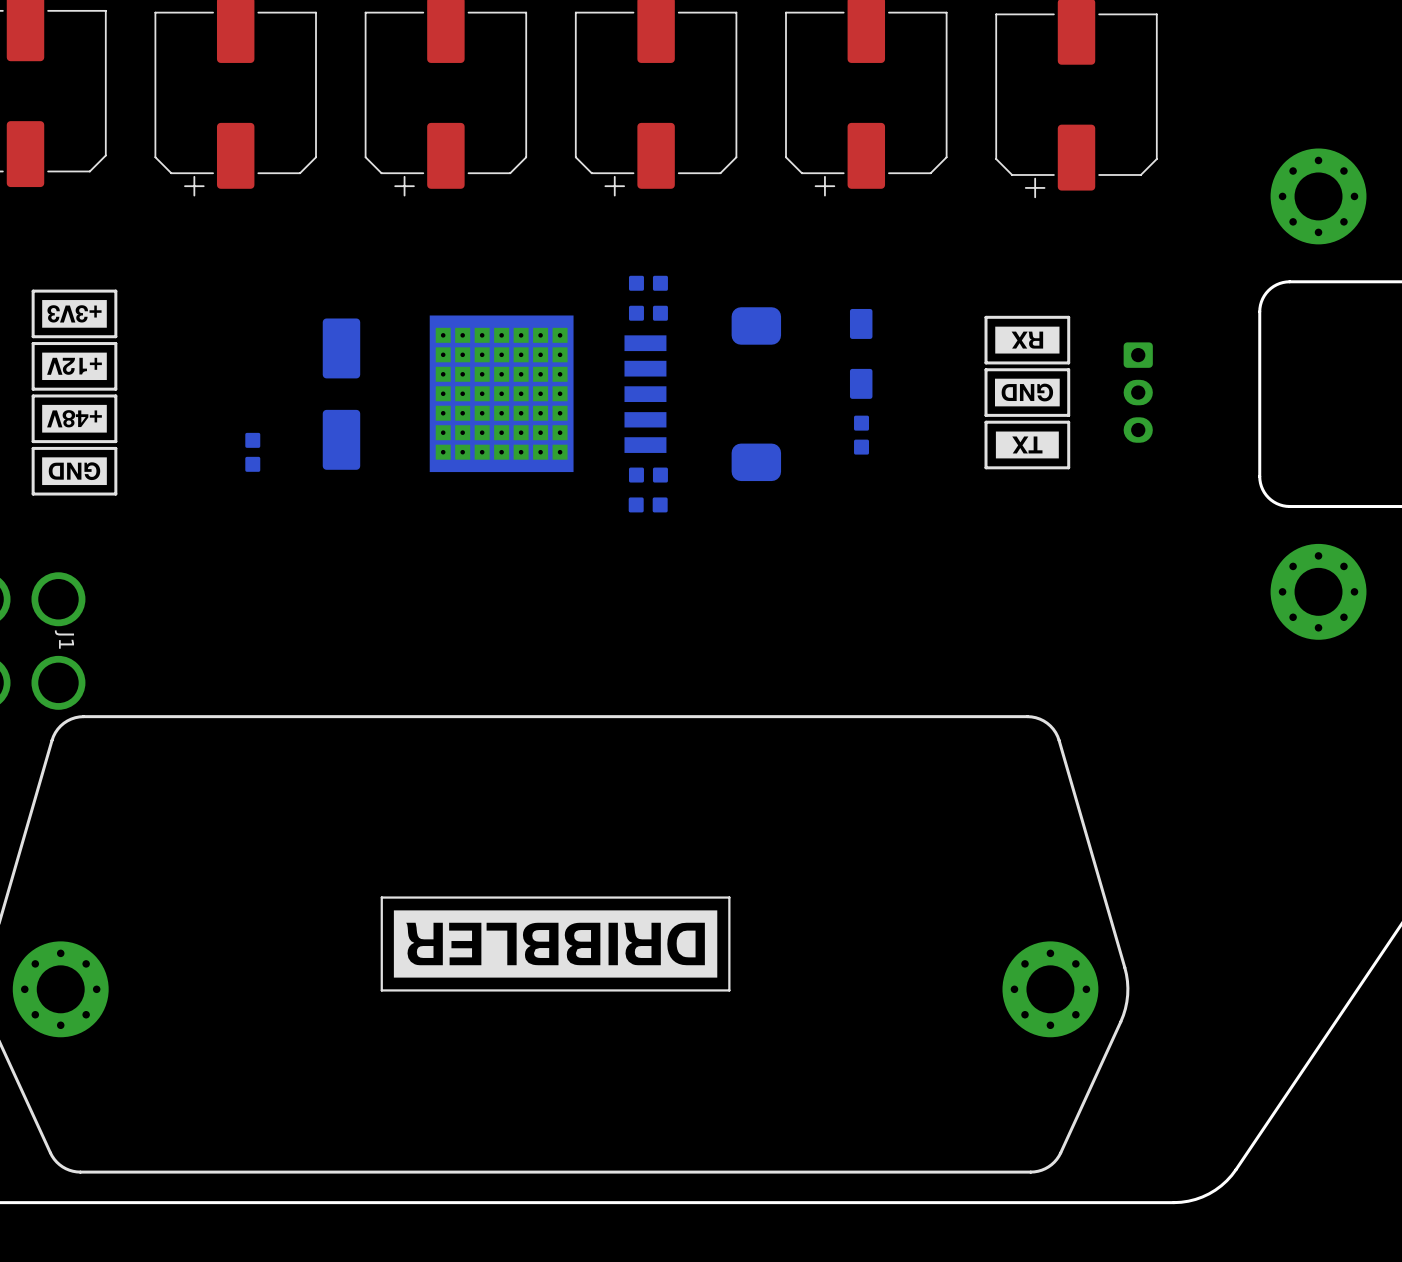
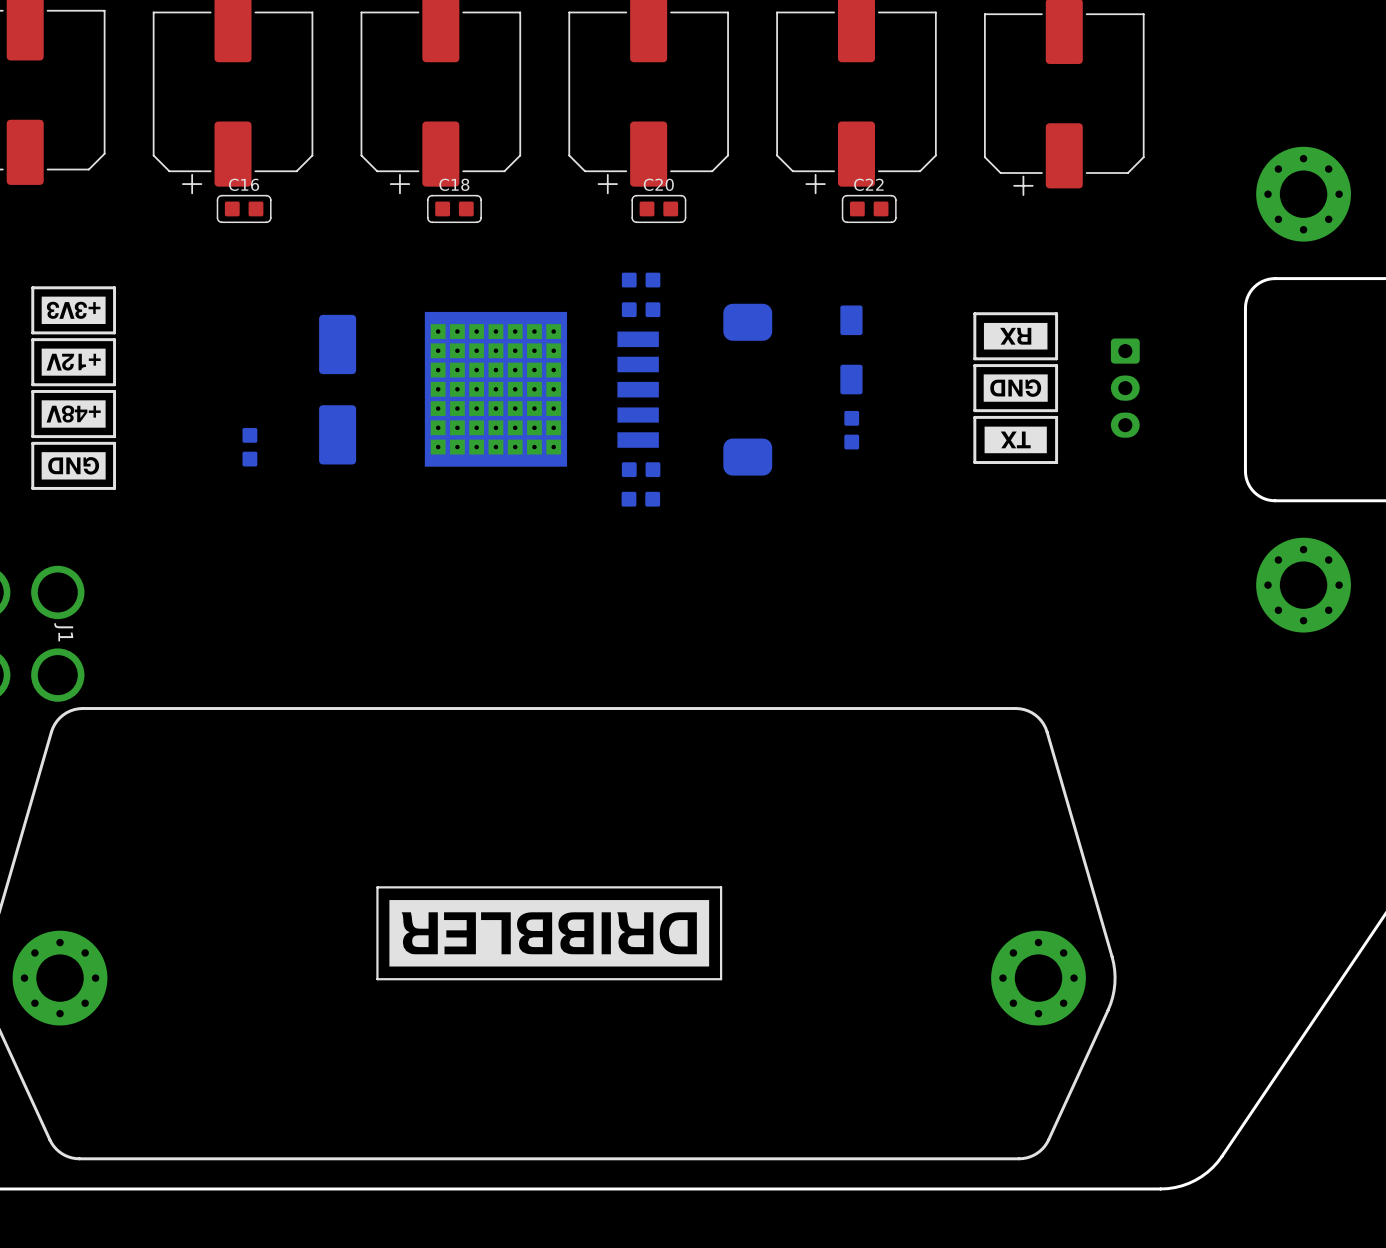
C16: none -> (244, 208)
C18: none -> (454, 208)
C20: none -> (658, 208)
C22: none -> (869, 208)

